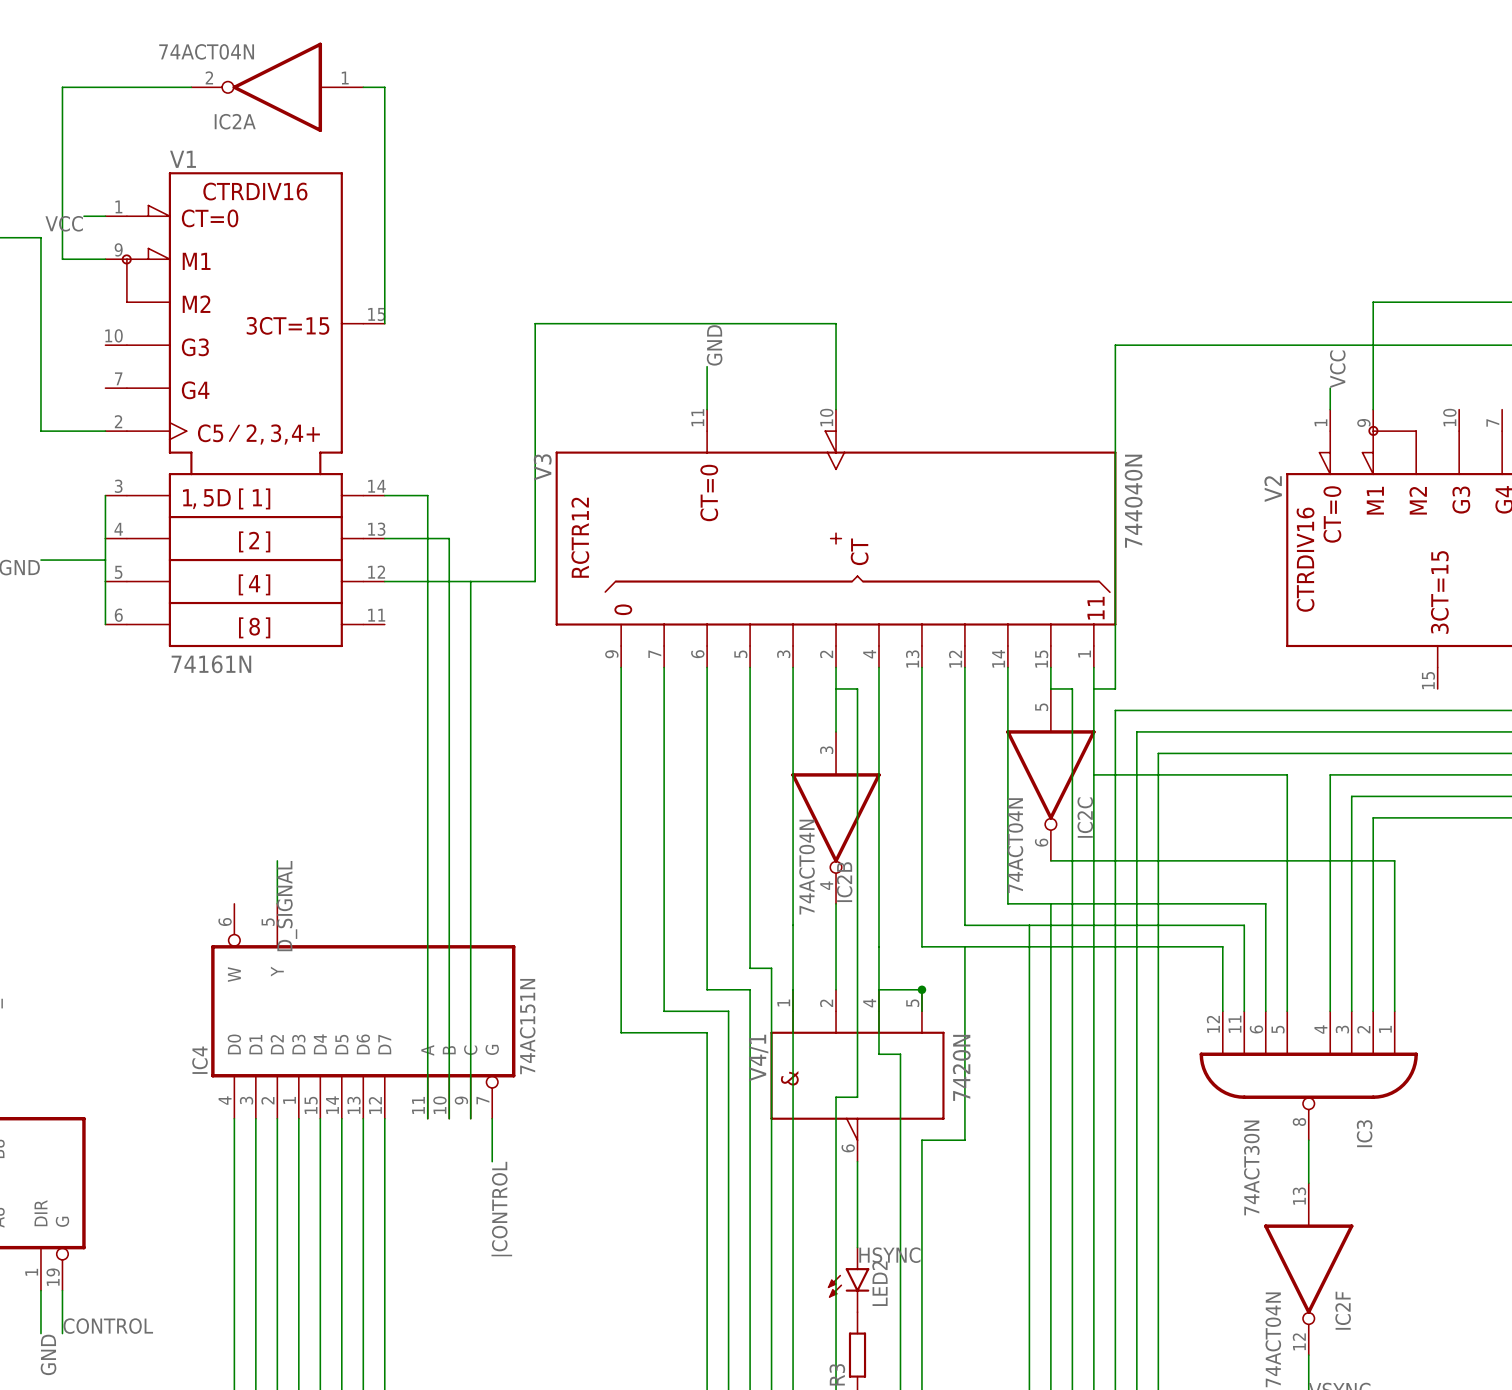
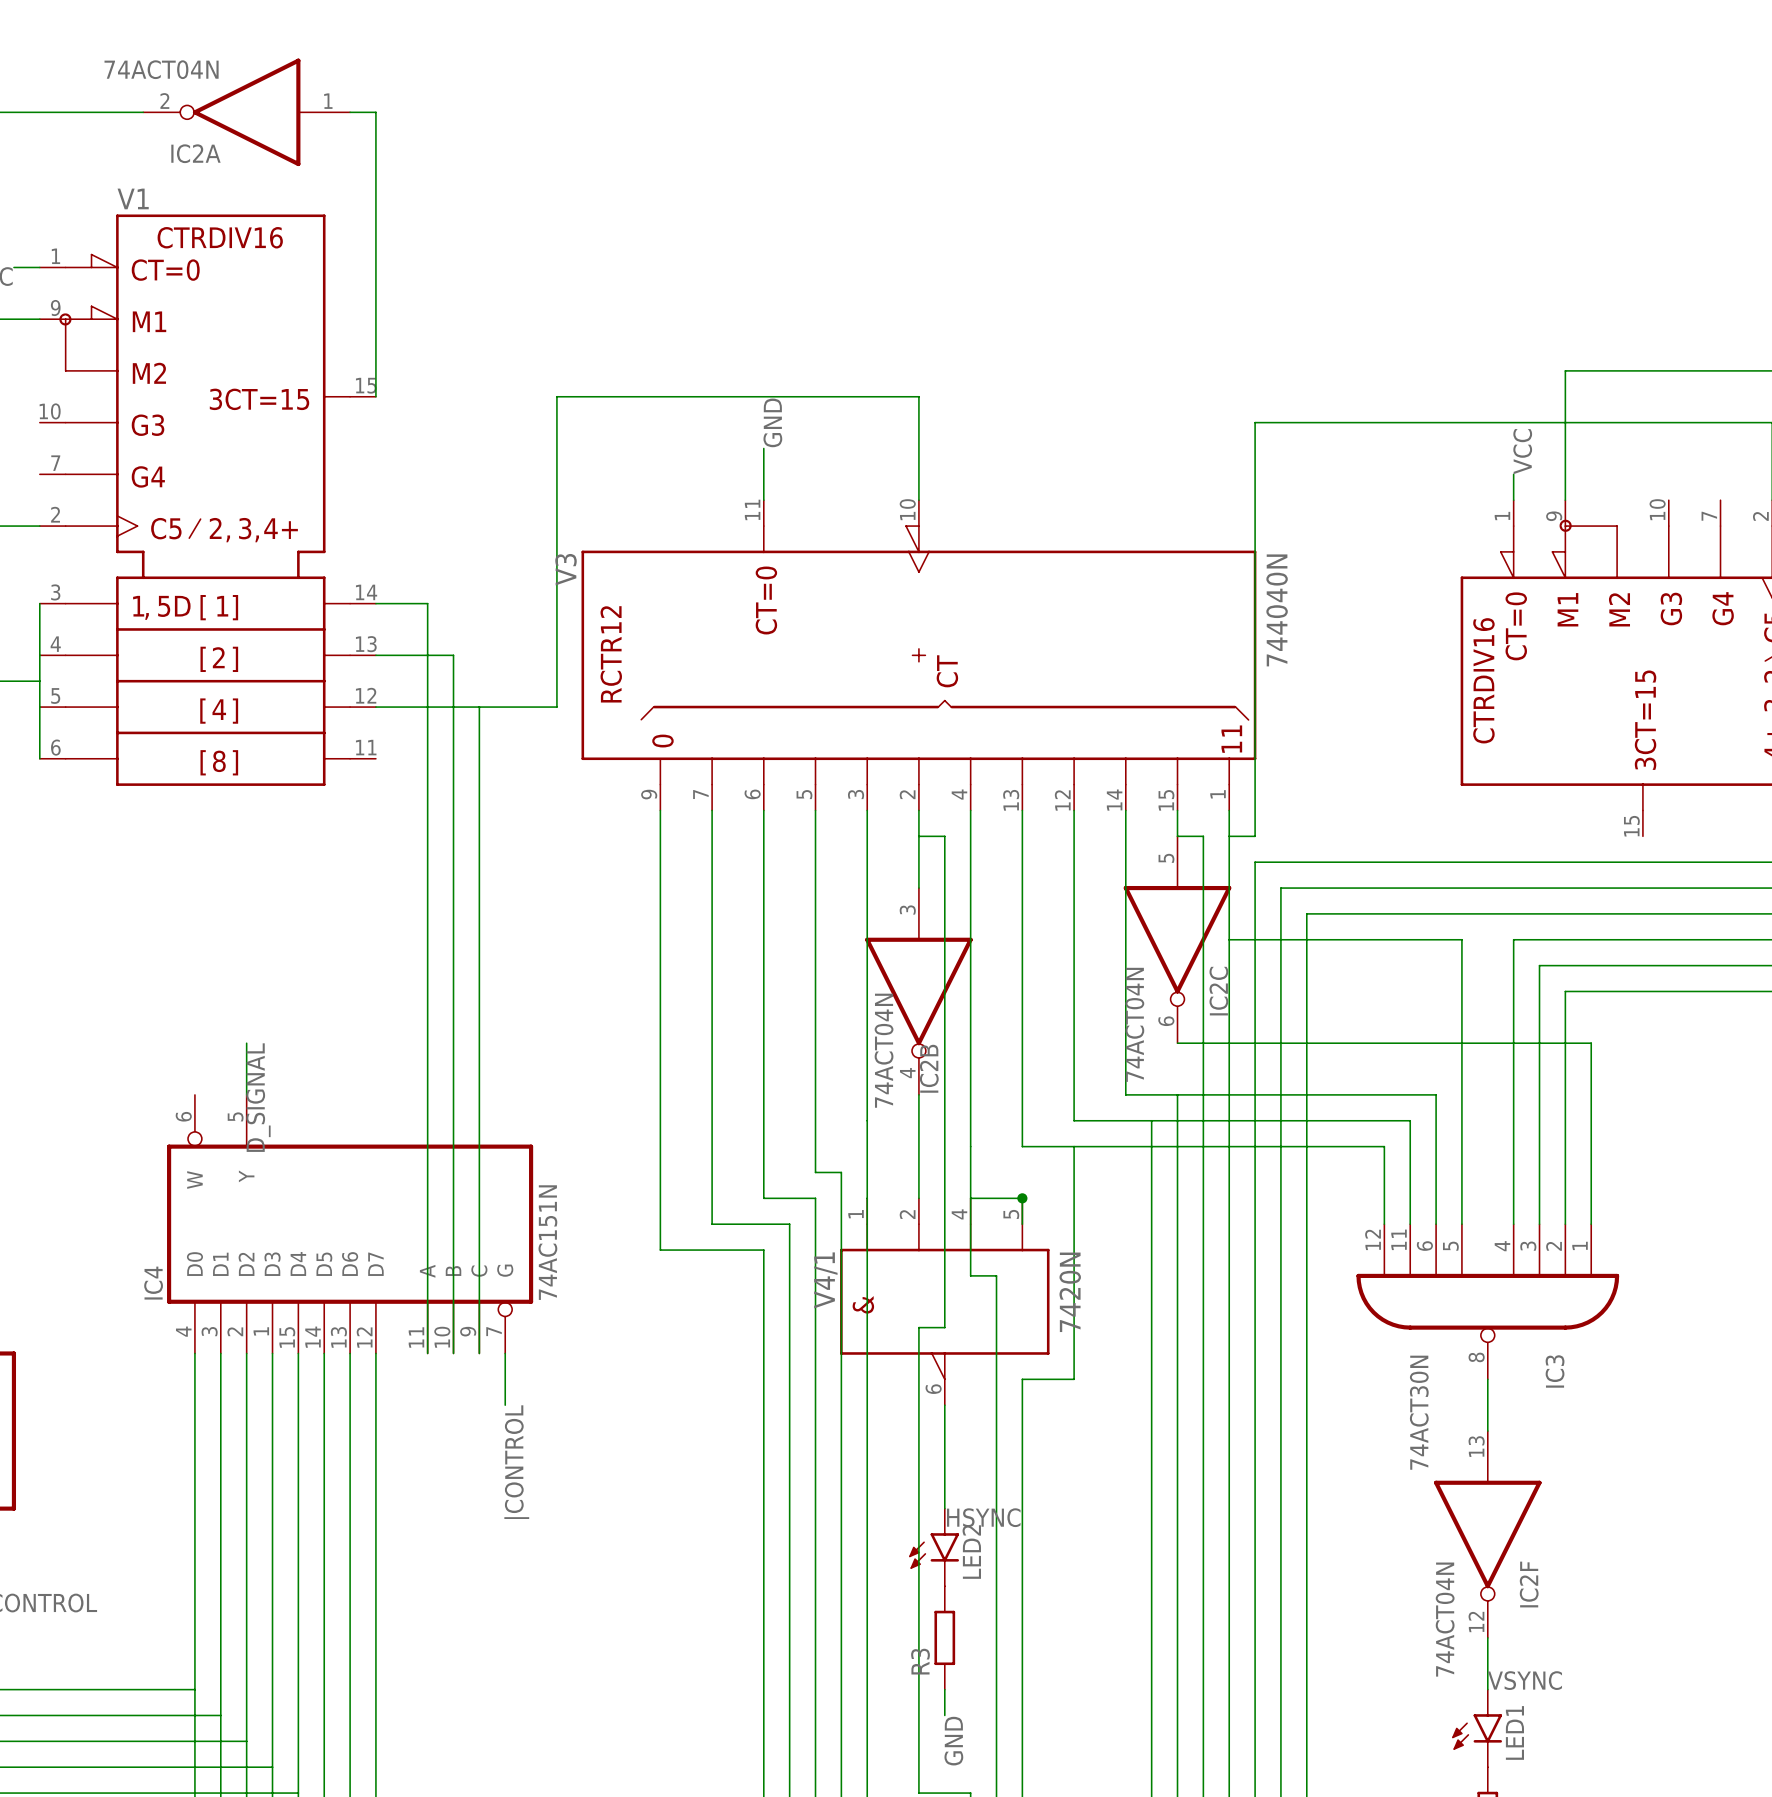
V2 name: V2 (1273, 489) -> none
V1 value: 74161N (211, 664) -> none

